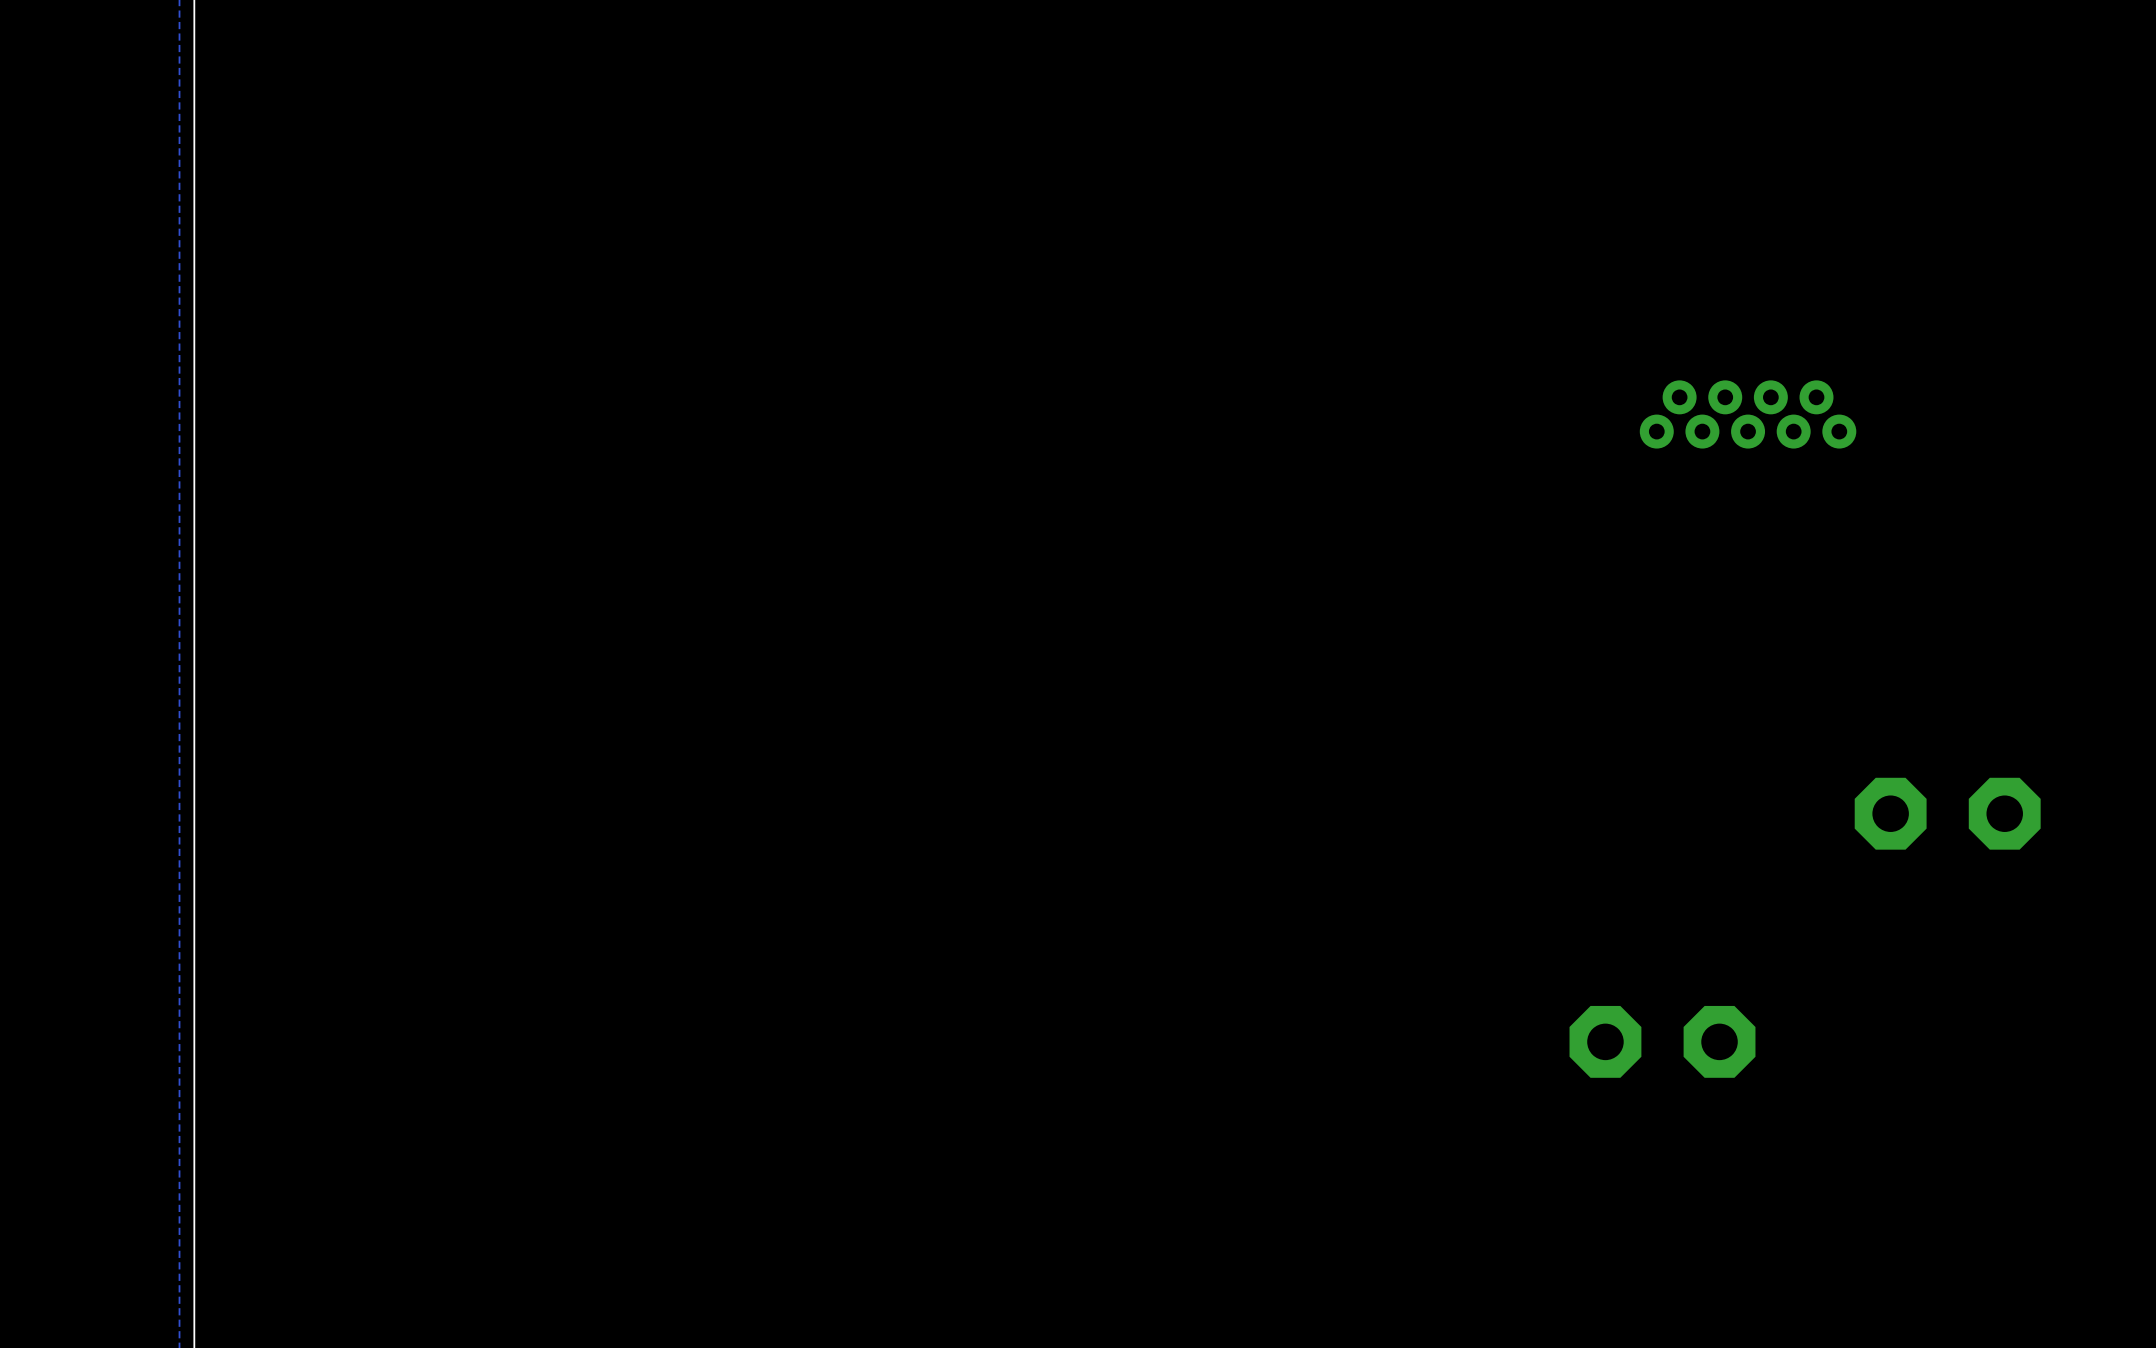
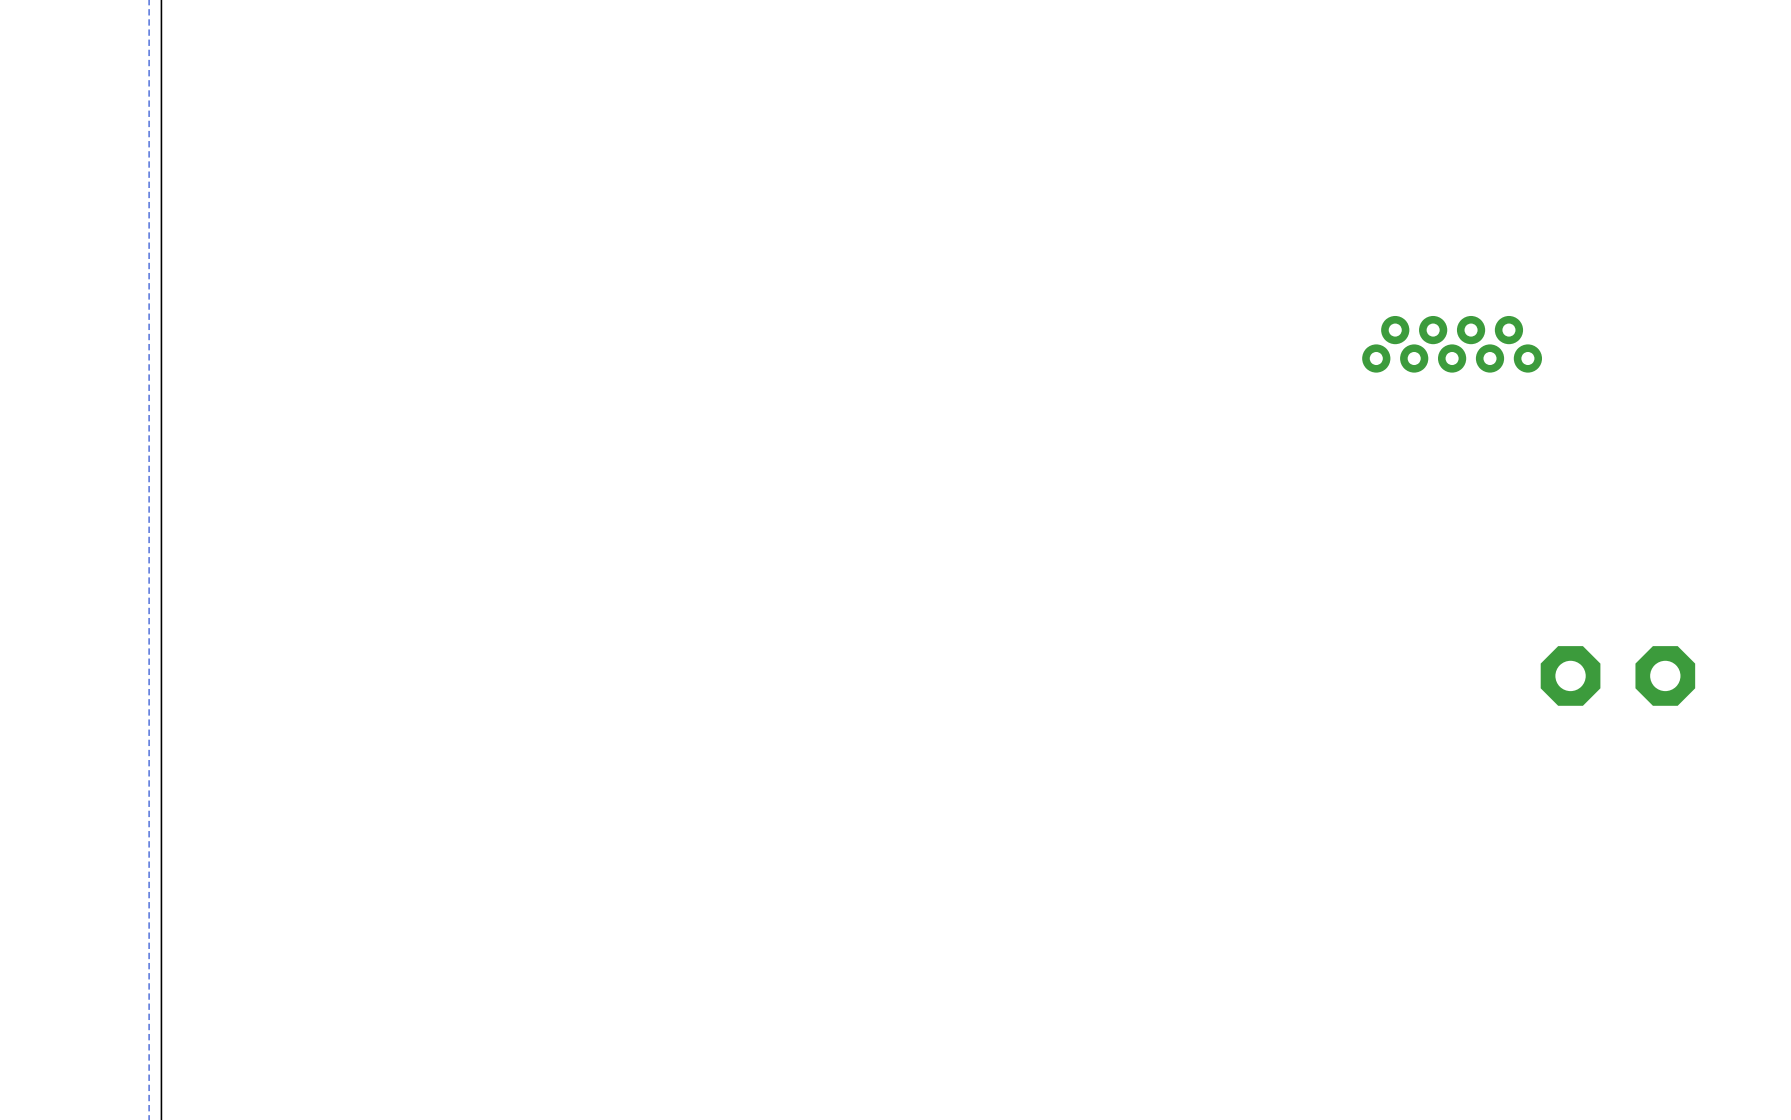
part: (1662, 1041) -> none

